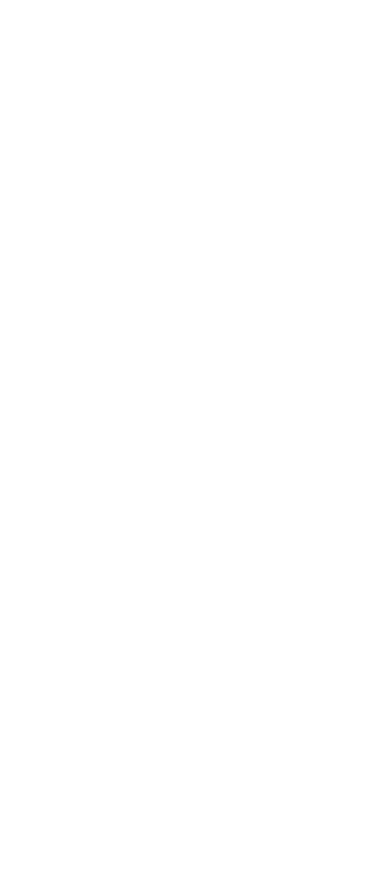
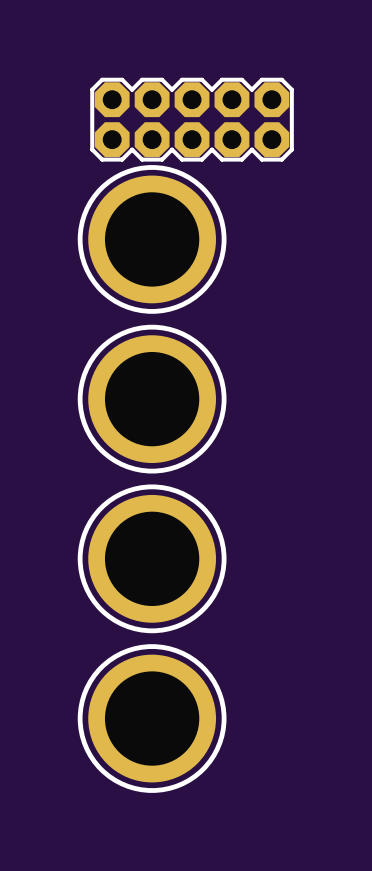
part: none -> (192, 119)
part: none -> (152, 239)
part: none -> (152, 399)
part: none -> (152, 558)
part: none -> (152, 718)

